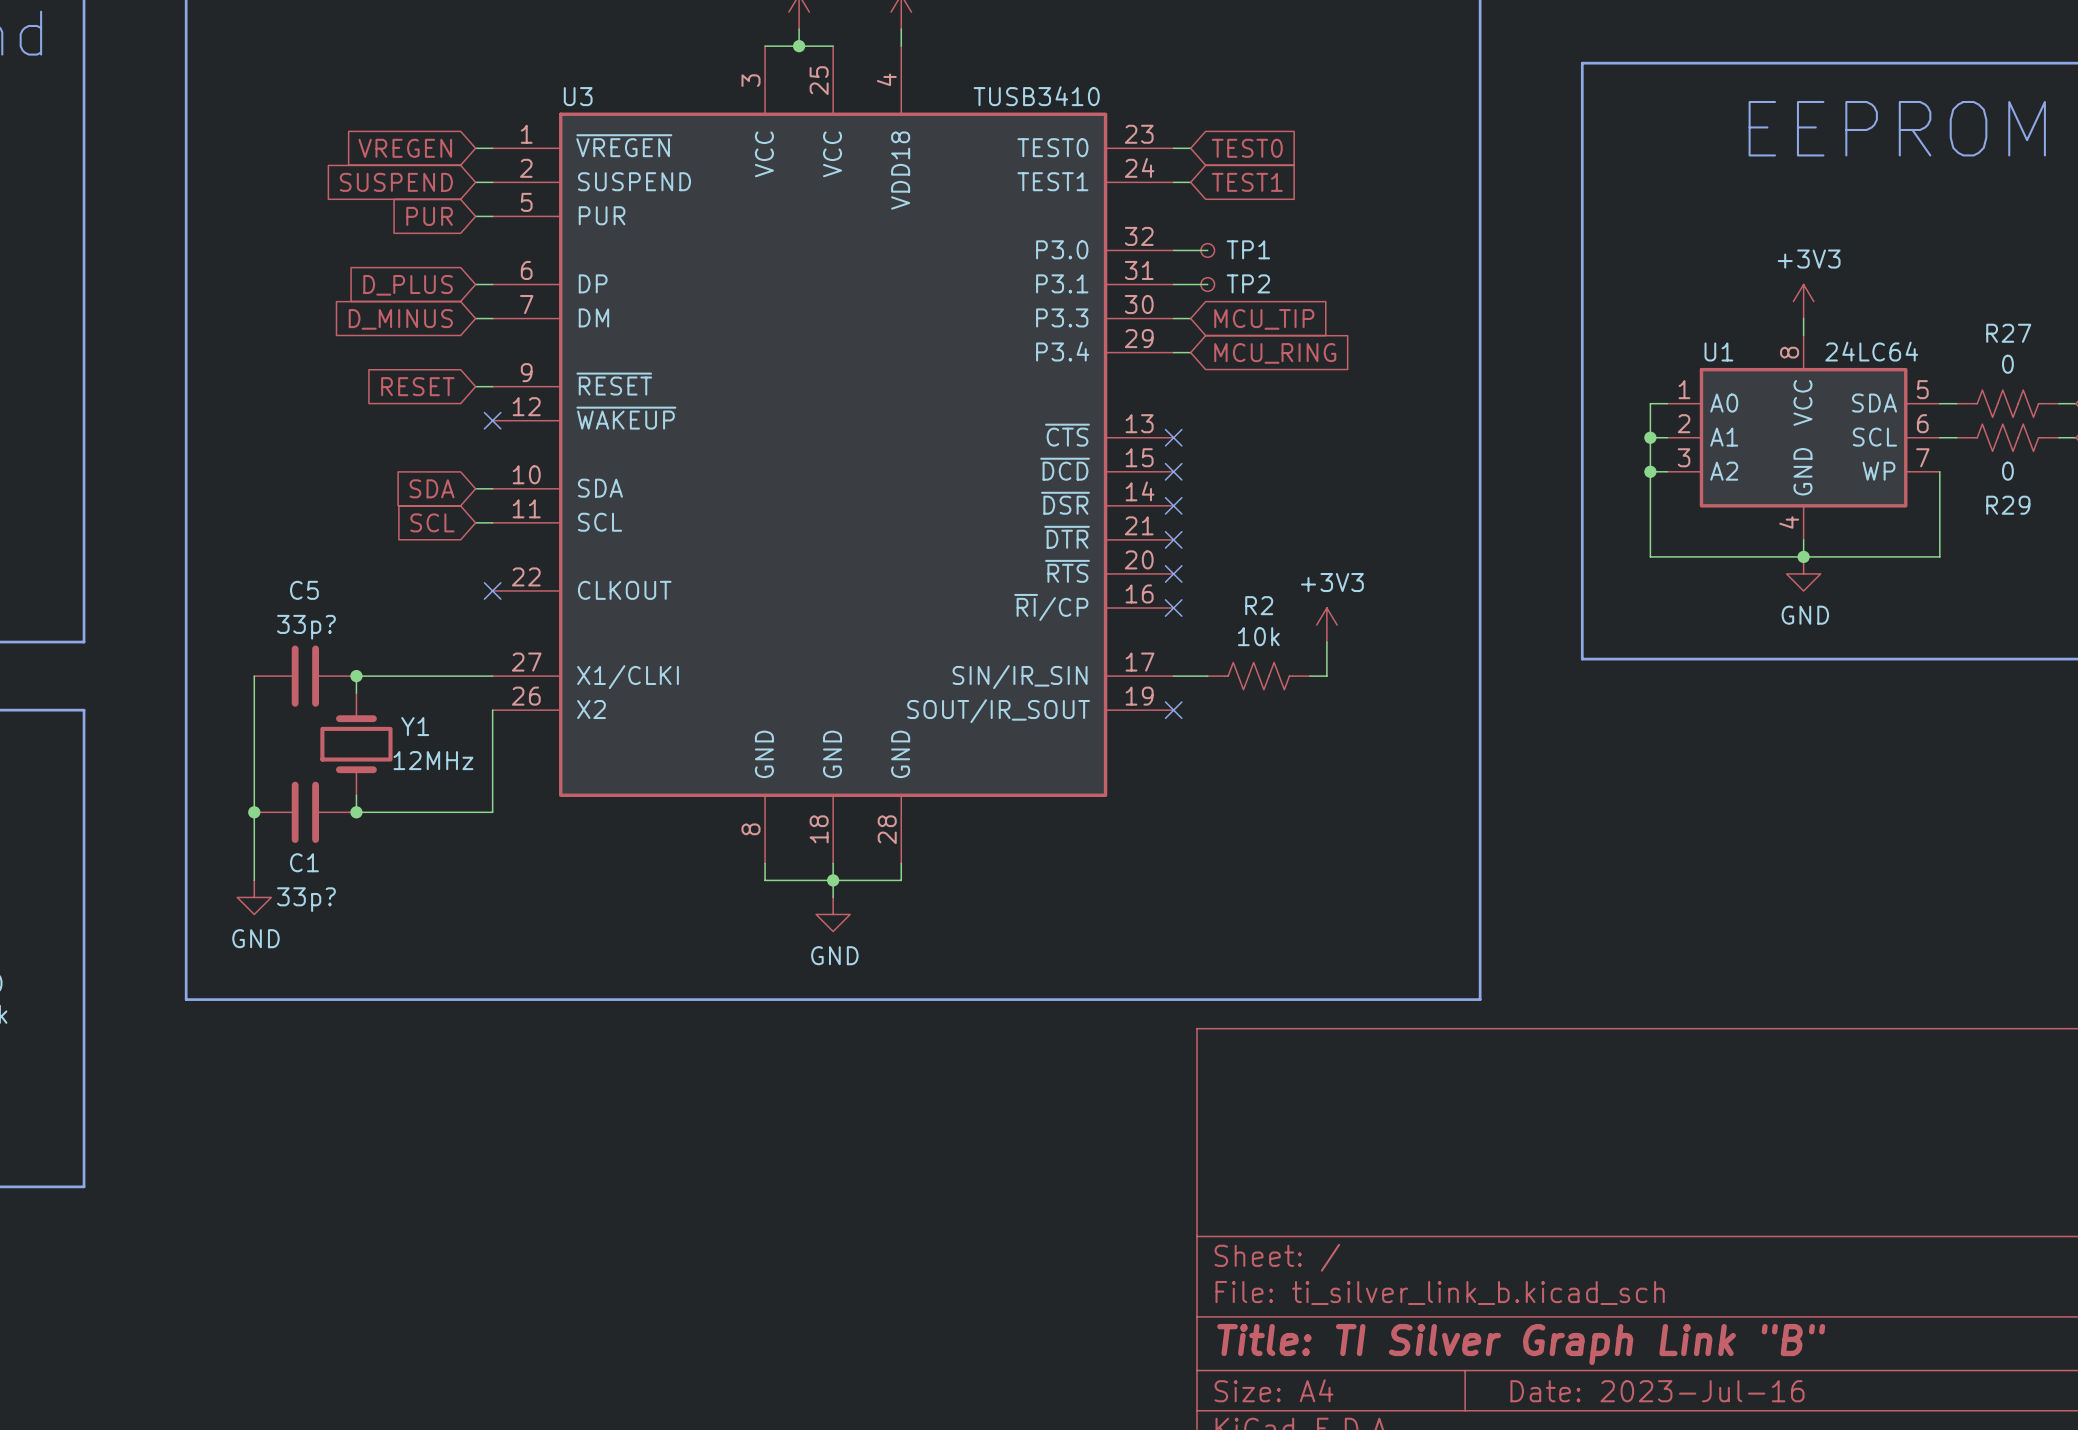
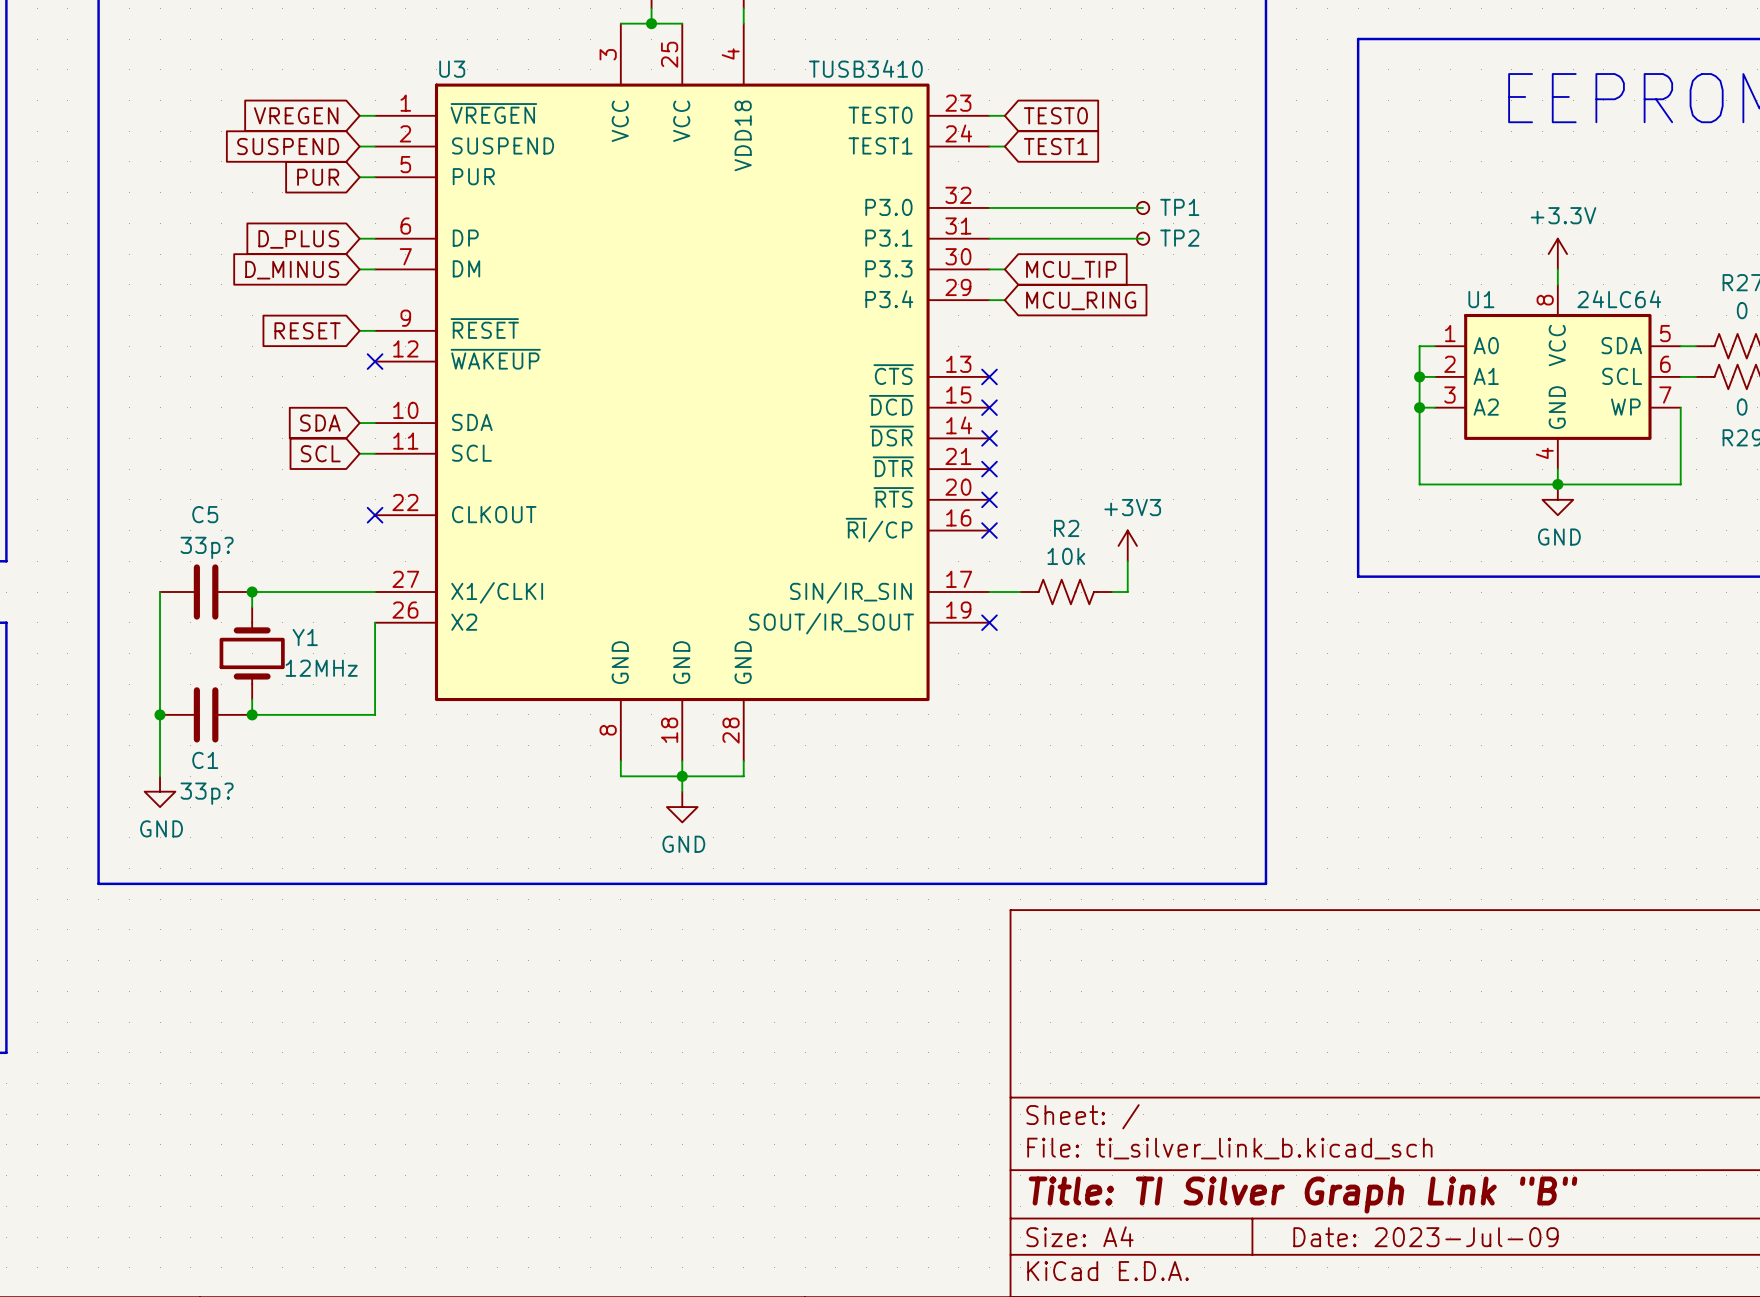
wire: none -> (1020, 207) (1143, 207)
TP1 position: (1207, 250) -> (1143, 207)
wire: none -> (1020, 238) (1143, 238)
TP2 position: (1207, 284) -> (1143, 238)
power symbol: +3V3 (1803, 301) -> +3.3V (1557, 254)
title block: Date: 2023-Jul-16 (1657, 1391) -> Date: 2023-Jul-09 (1426, 1237)

